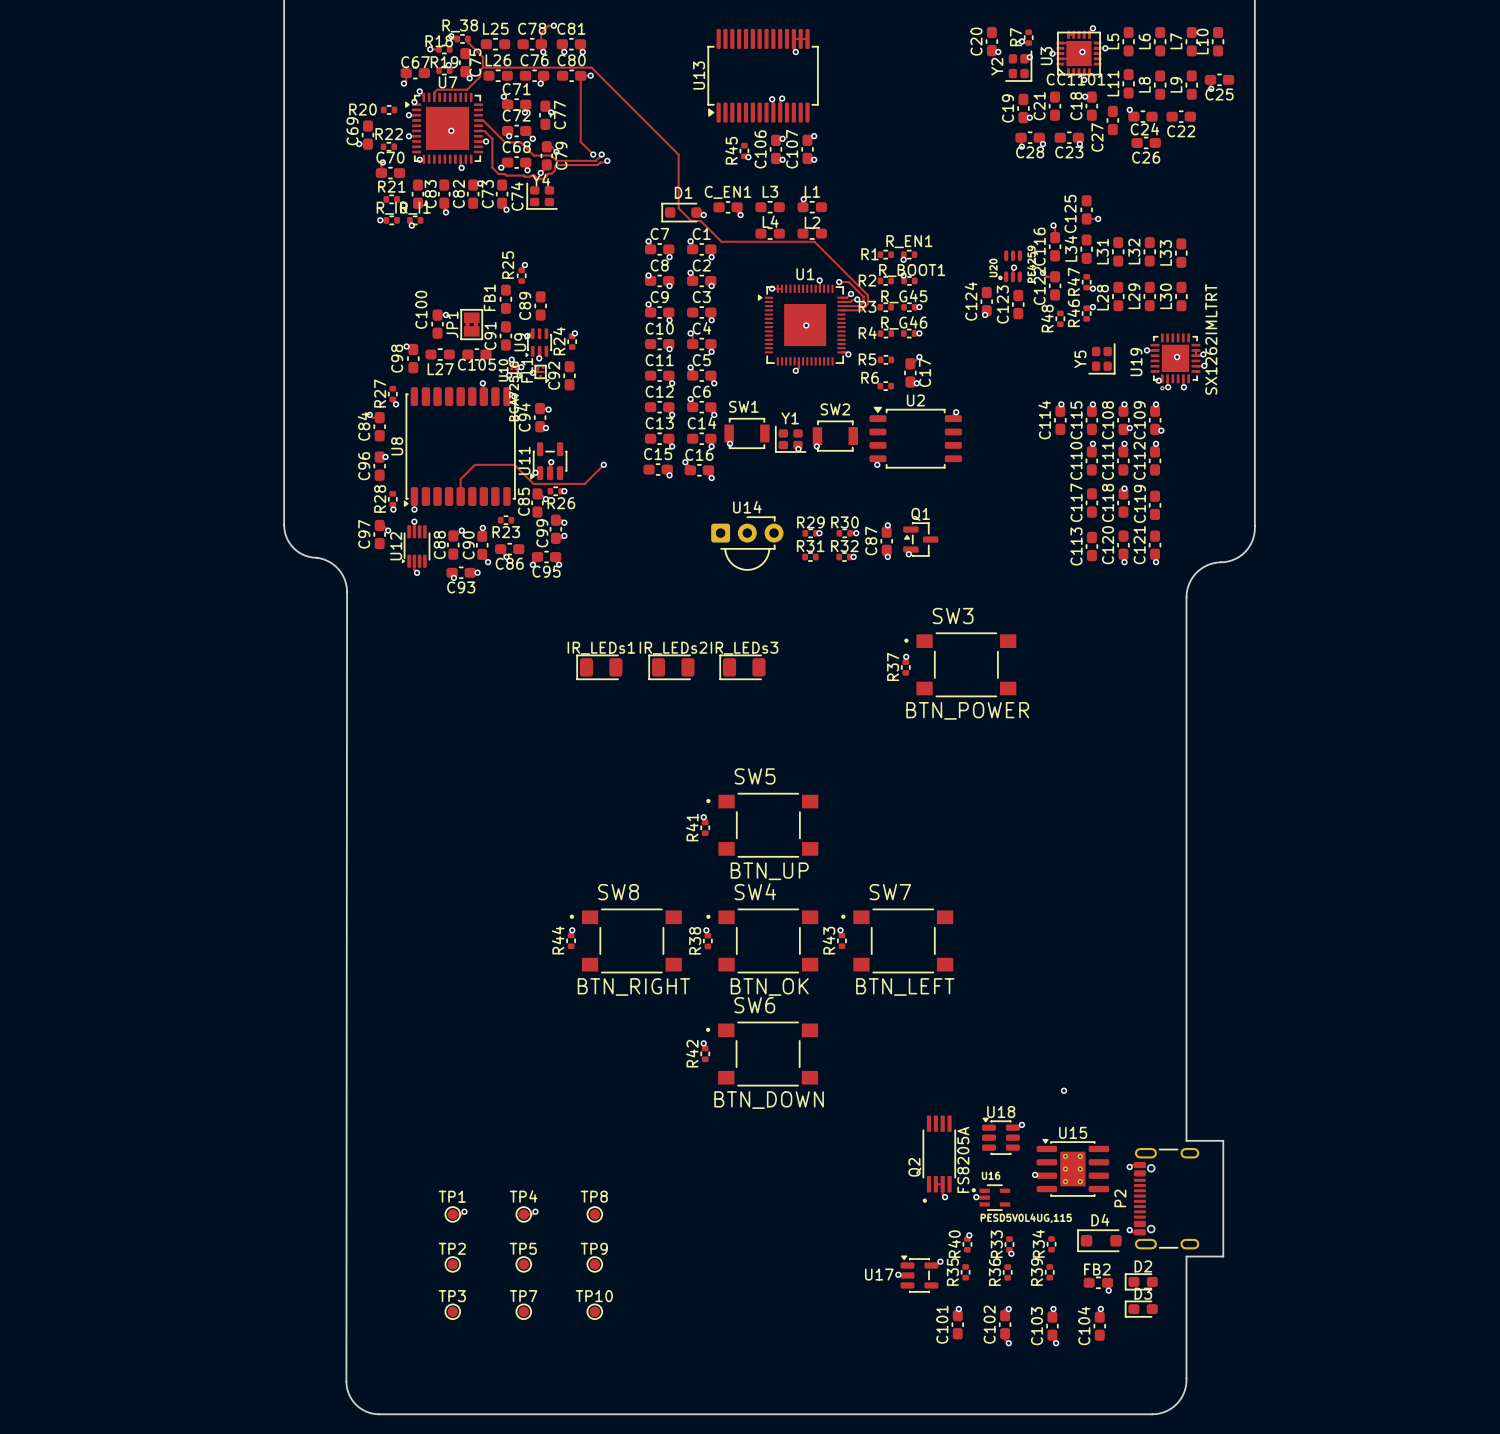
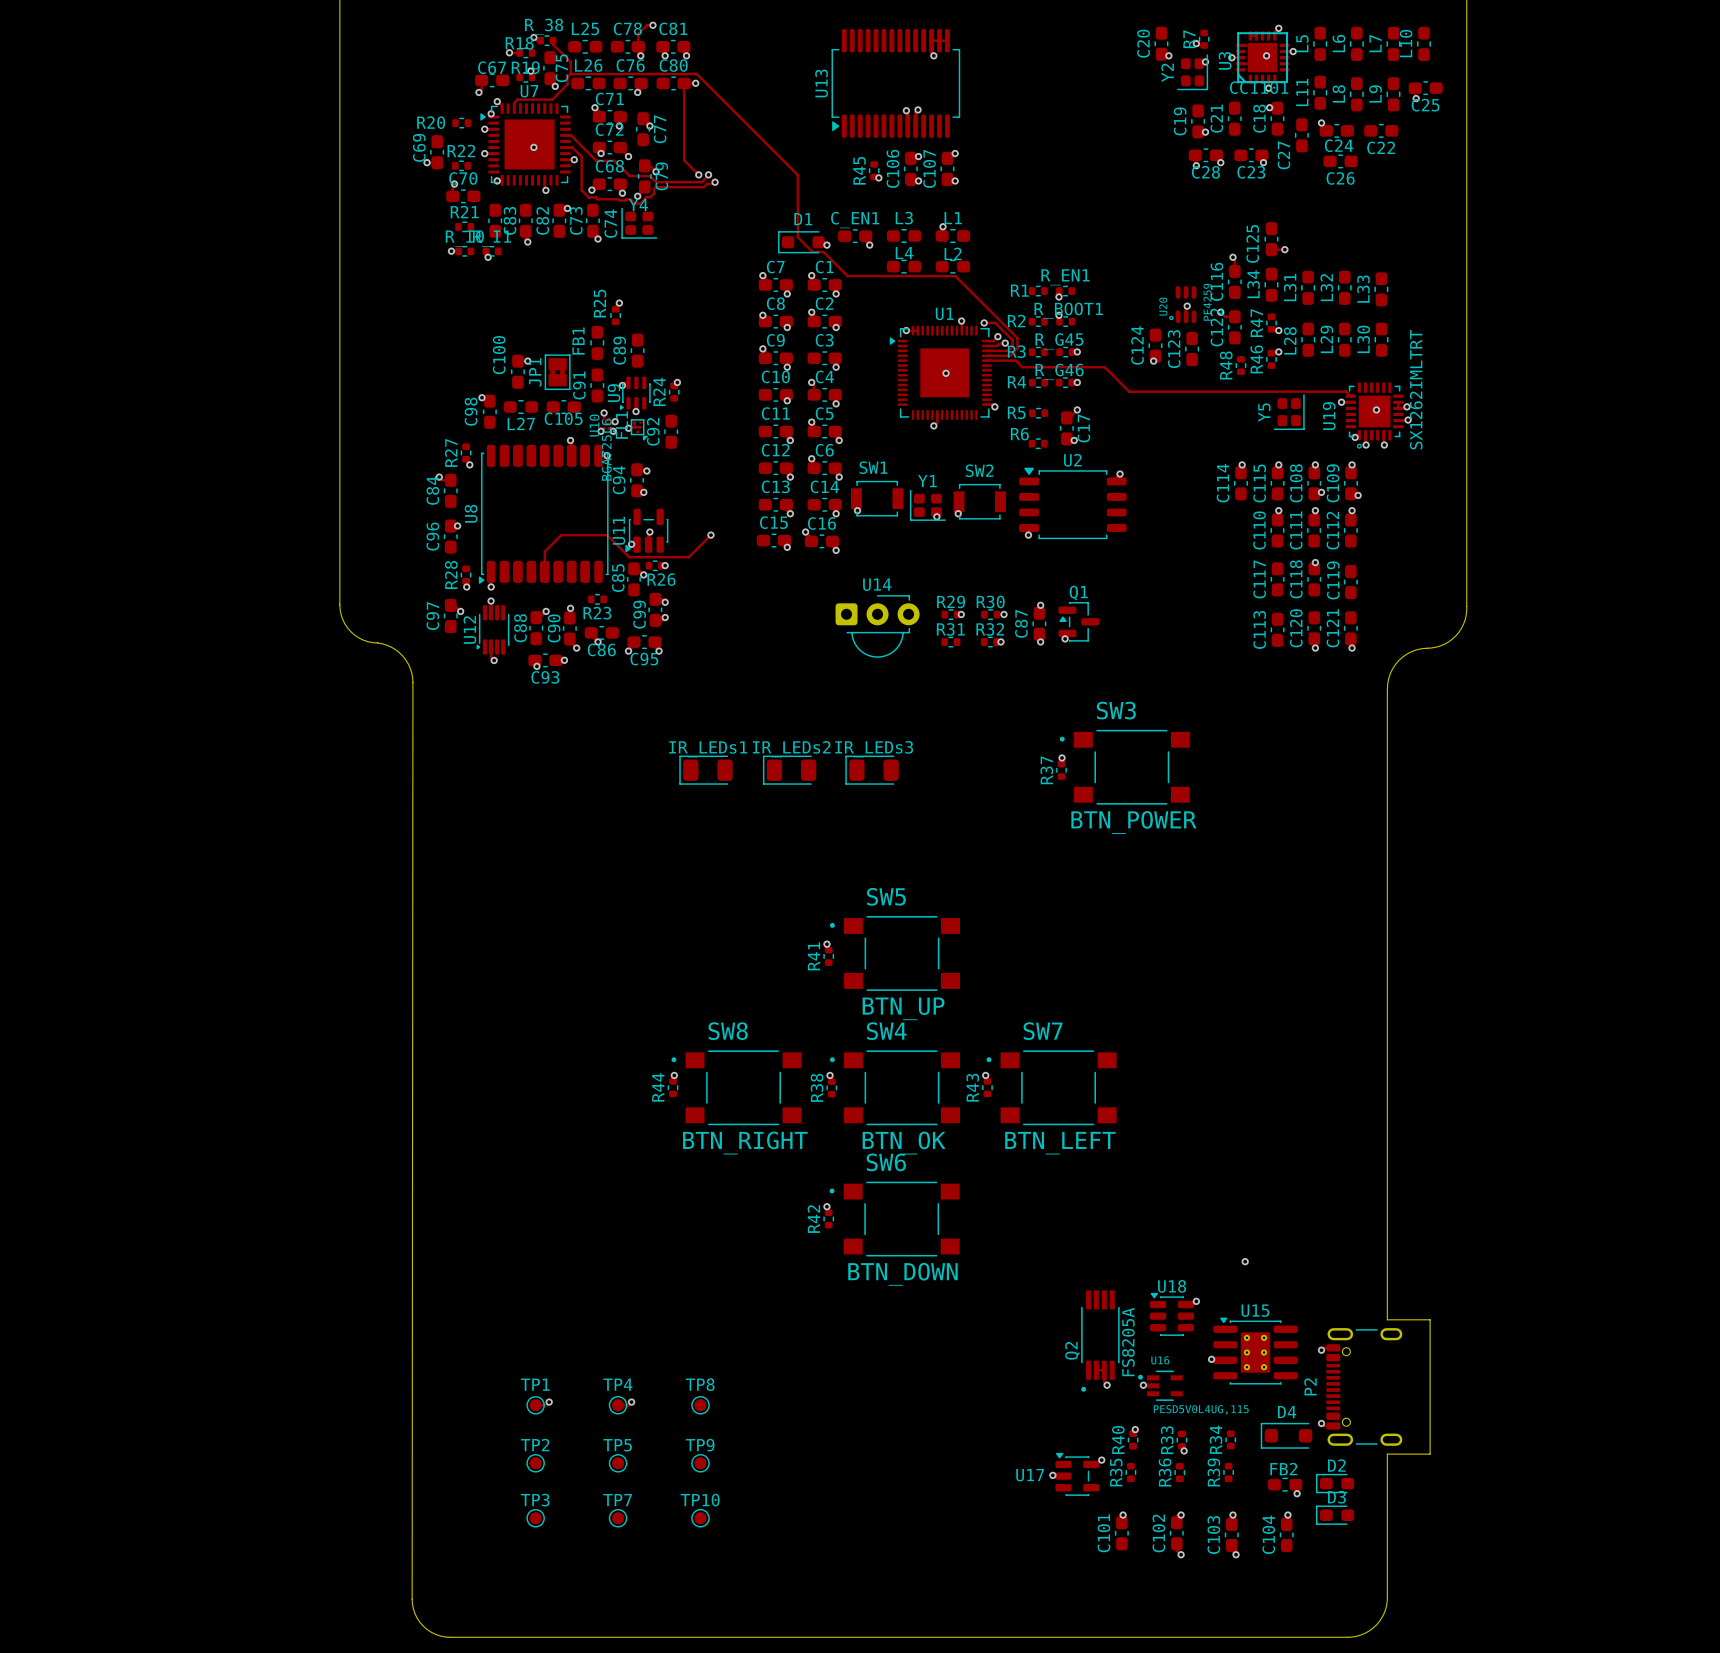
track: none -> (986, 360) (1015, 360) (1022, 367) (1104, 367) (1129, 391) (1346, 391) (1350, 396)

